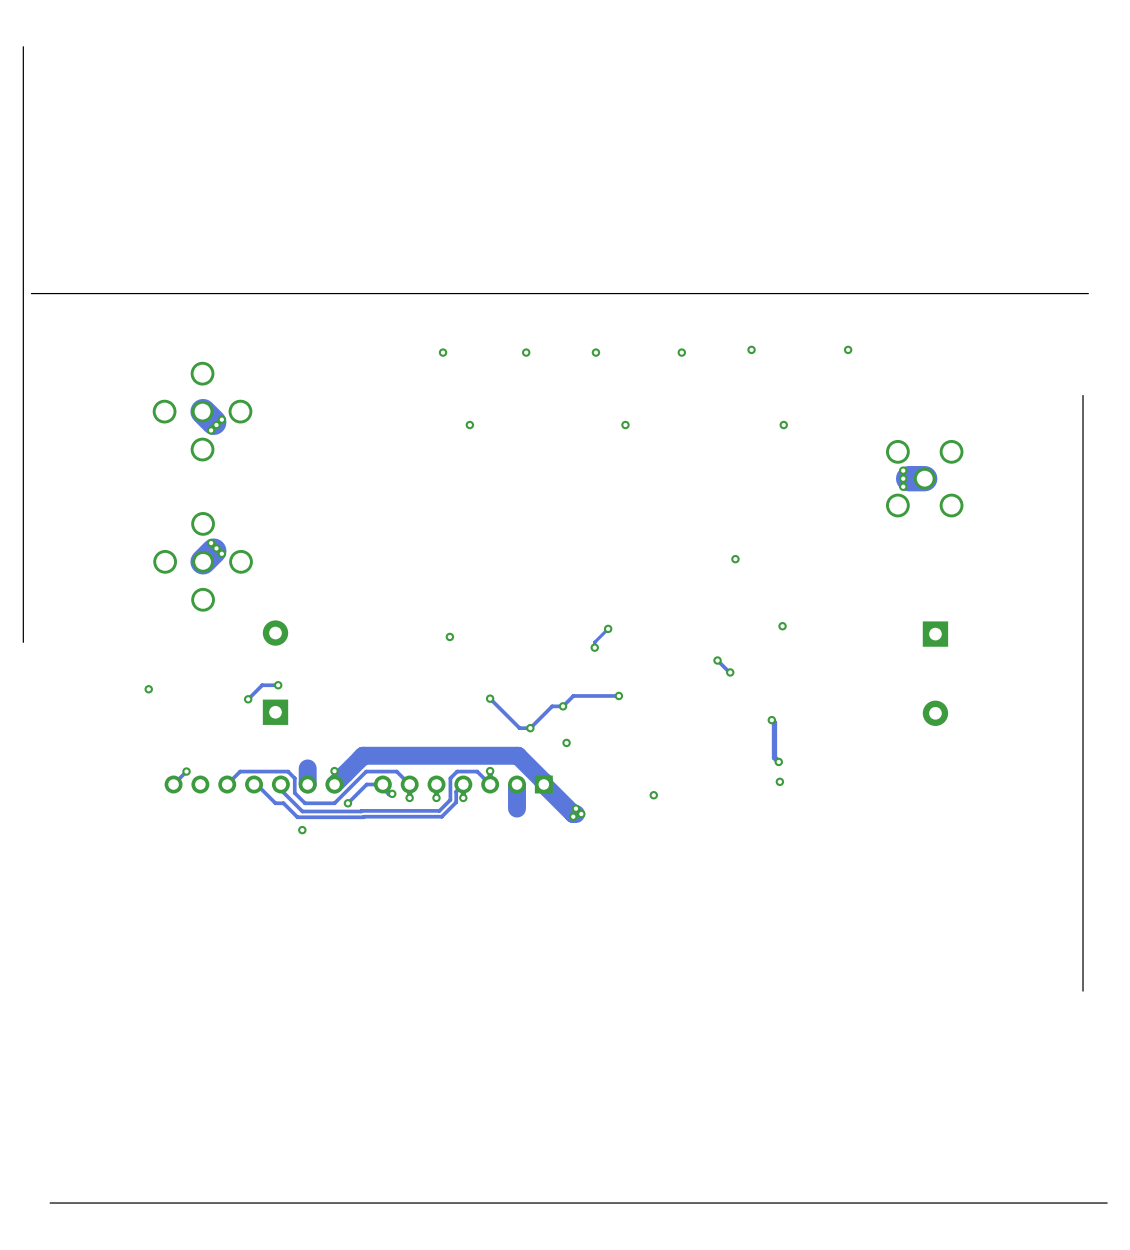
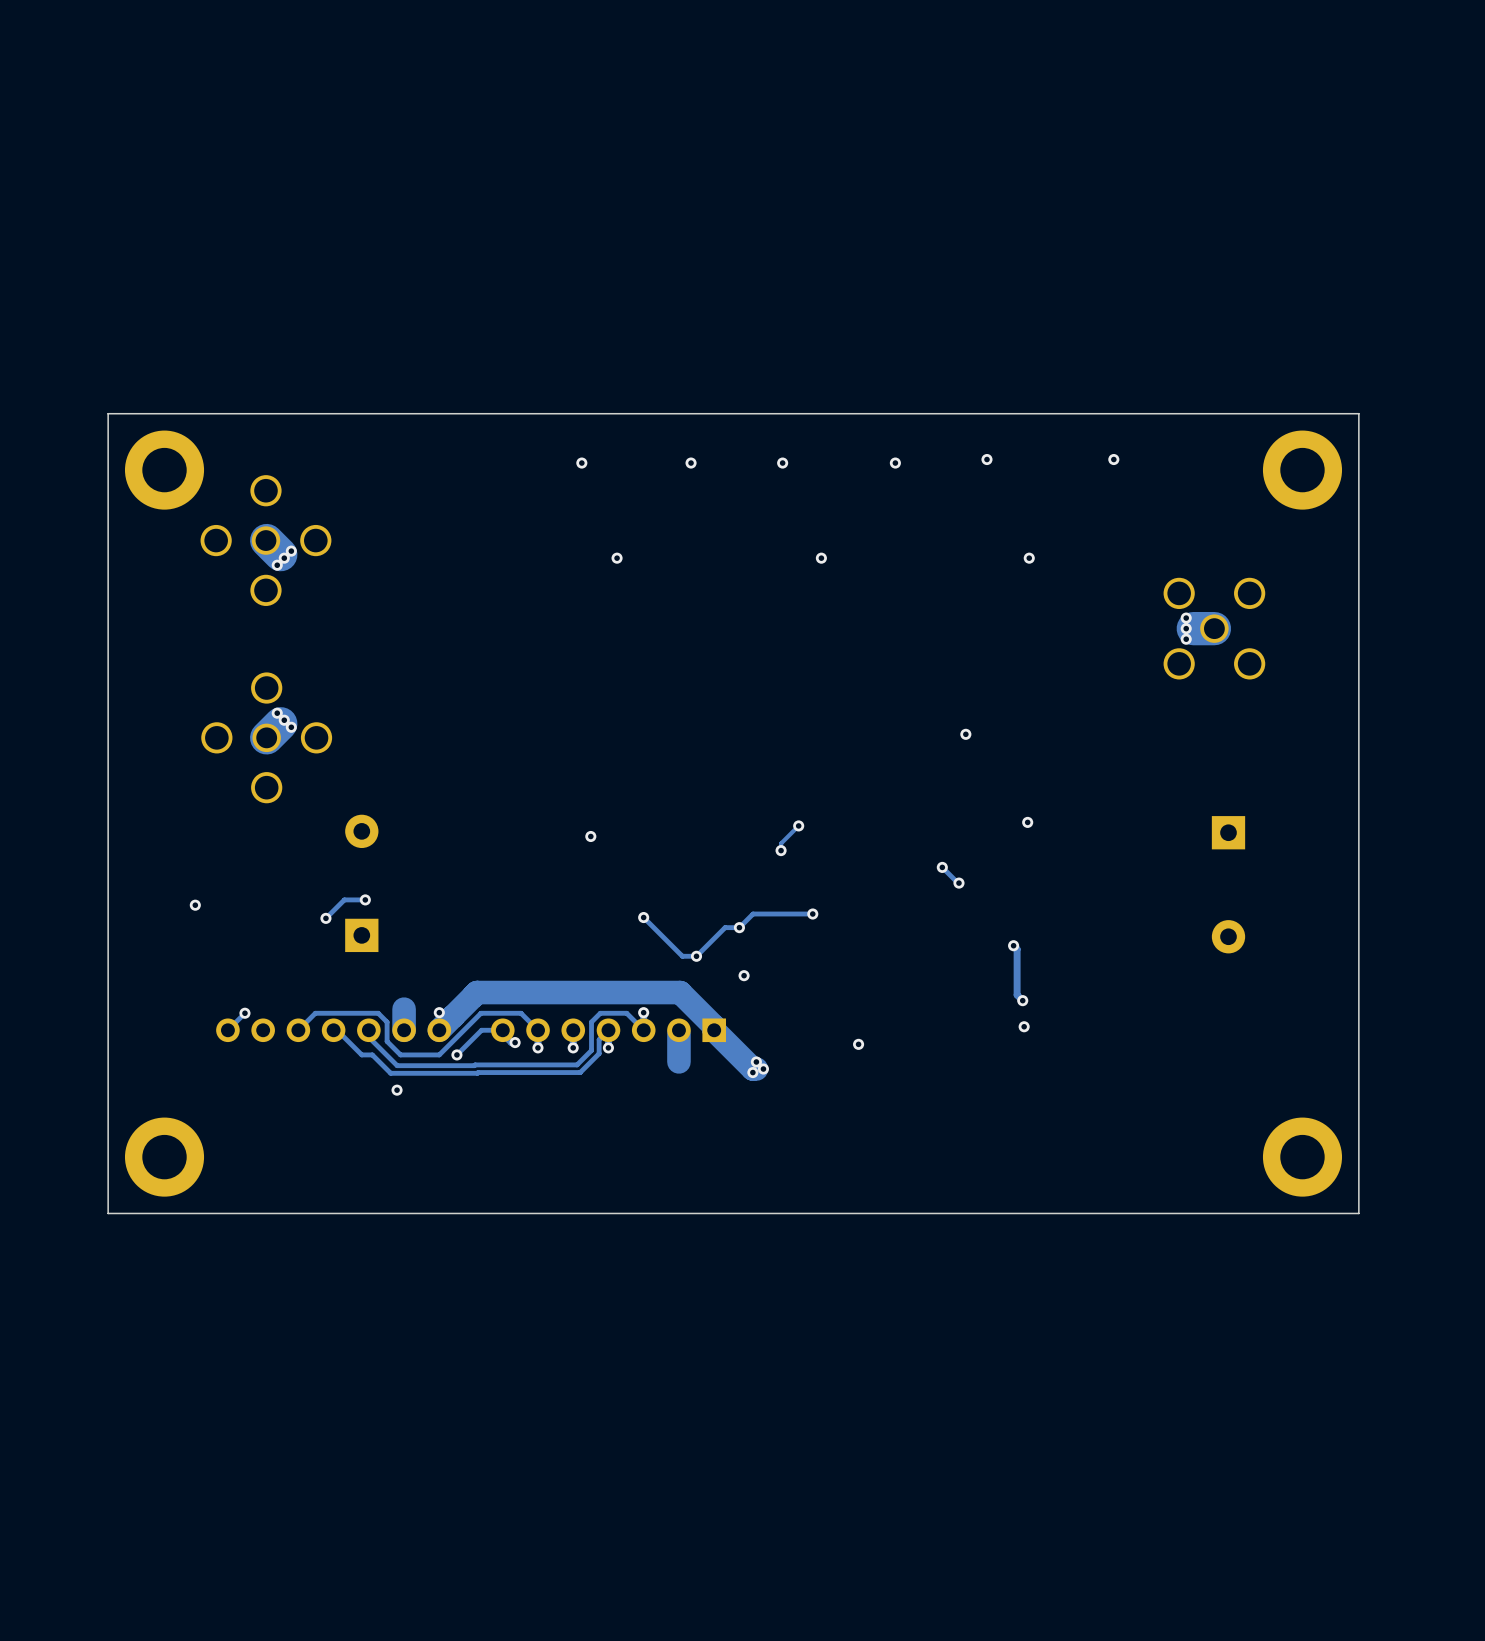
board edge: (23, 46) (23, 642) -> none
board edge: (1088, 293) (31, 293) -> none
board edge: none -> (1358, 413) (108, 413) (108, 1213) (1358, 1213) (1358, 413)
part: none -> (164, 470)
part: none -> (1302, 470)
board edge: (1083, 395) (1083, 991) -> none
part: none -> (164, 1157)
part: none -> (1302, 1157)
board edge: (1107, 1203) (50, 1203) -> none

